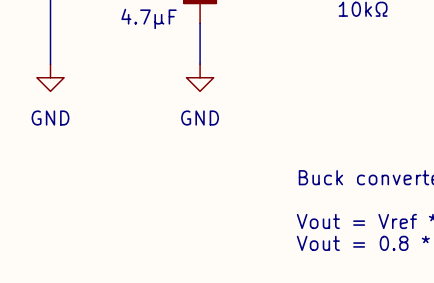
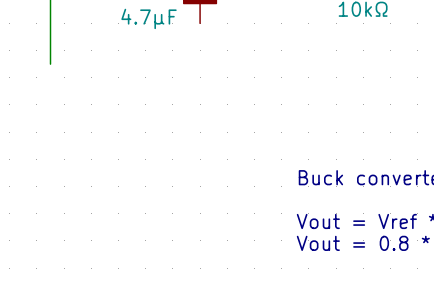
wire: (200, 23) (200, 64) -> none
power symbol: GND (50, 77) -> none
power symbol: GND (200, 77) -> none

